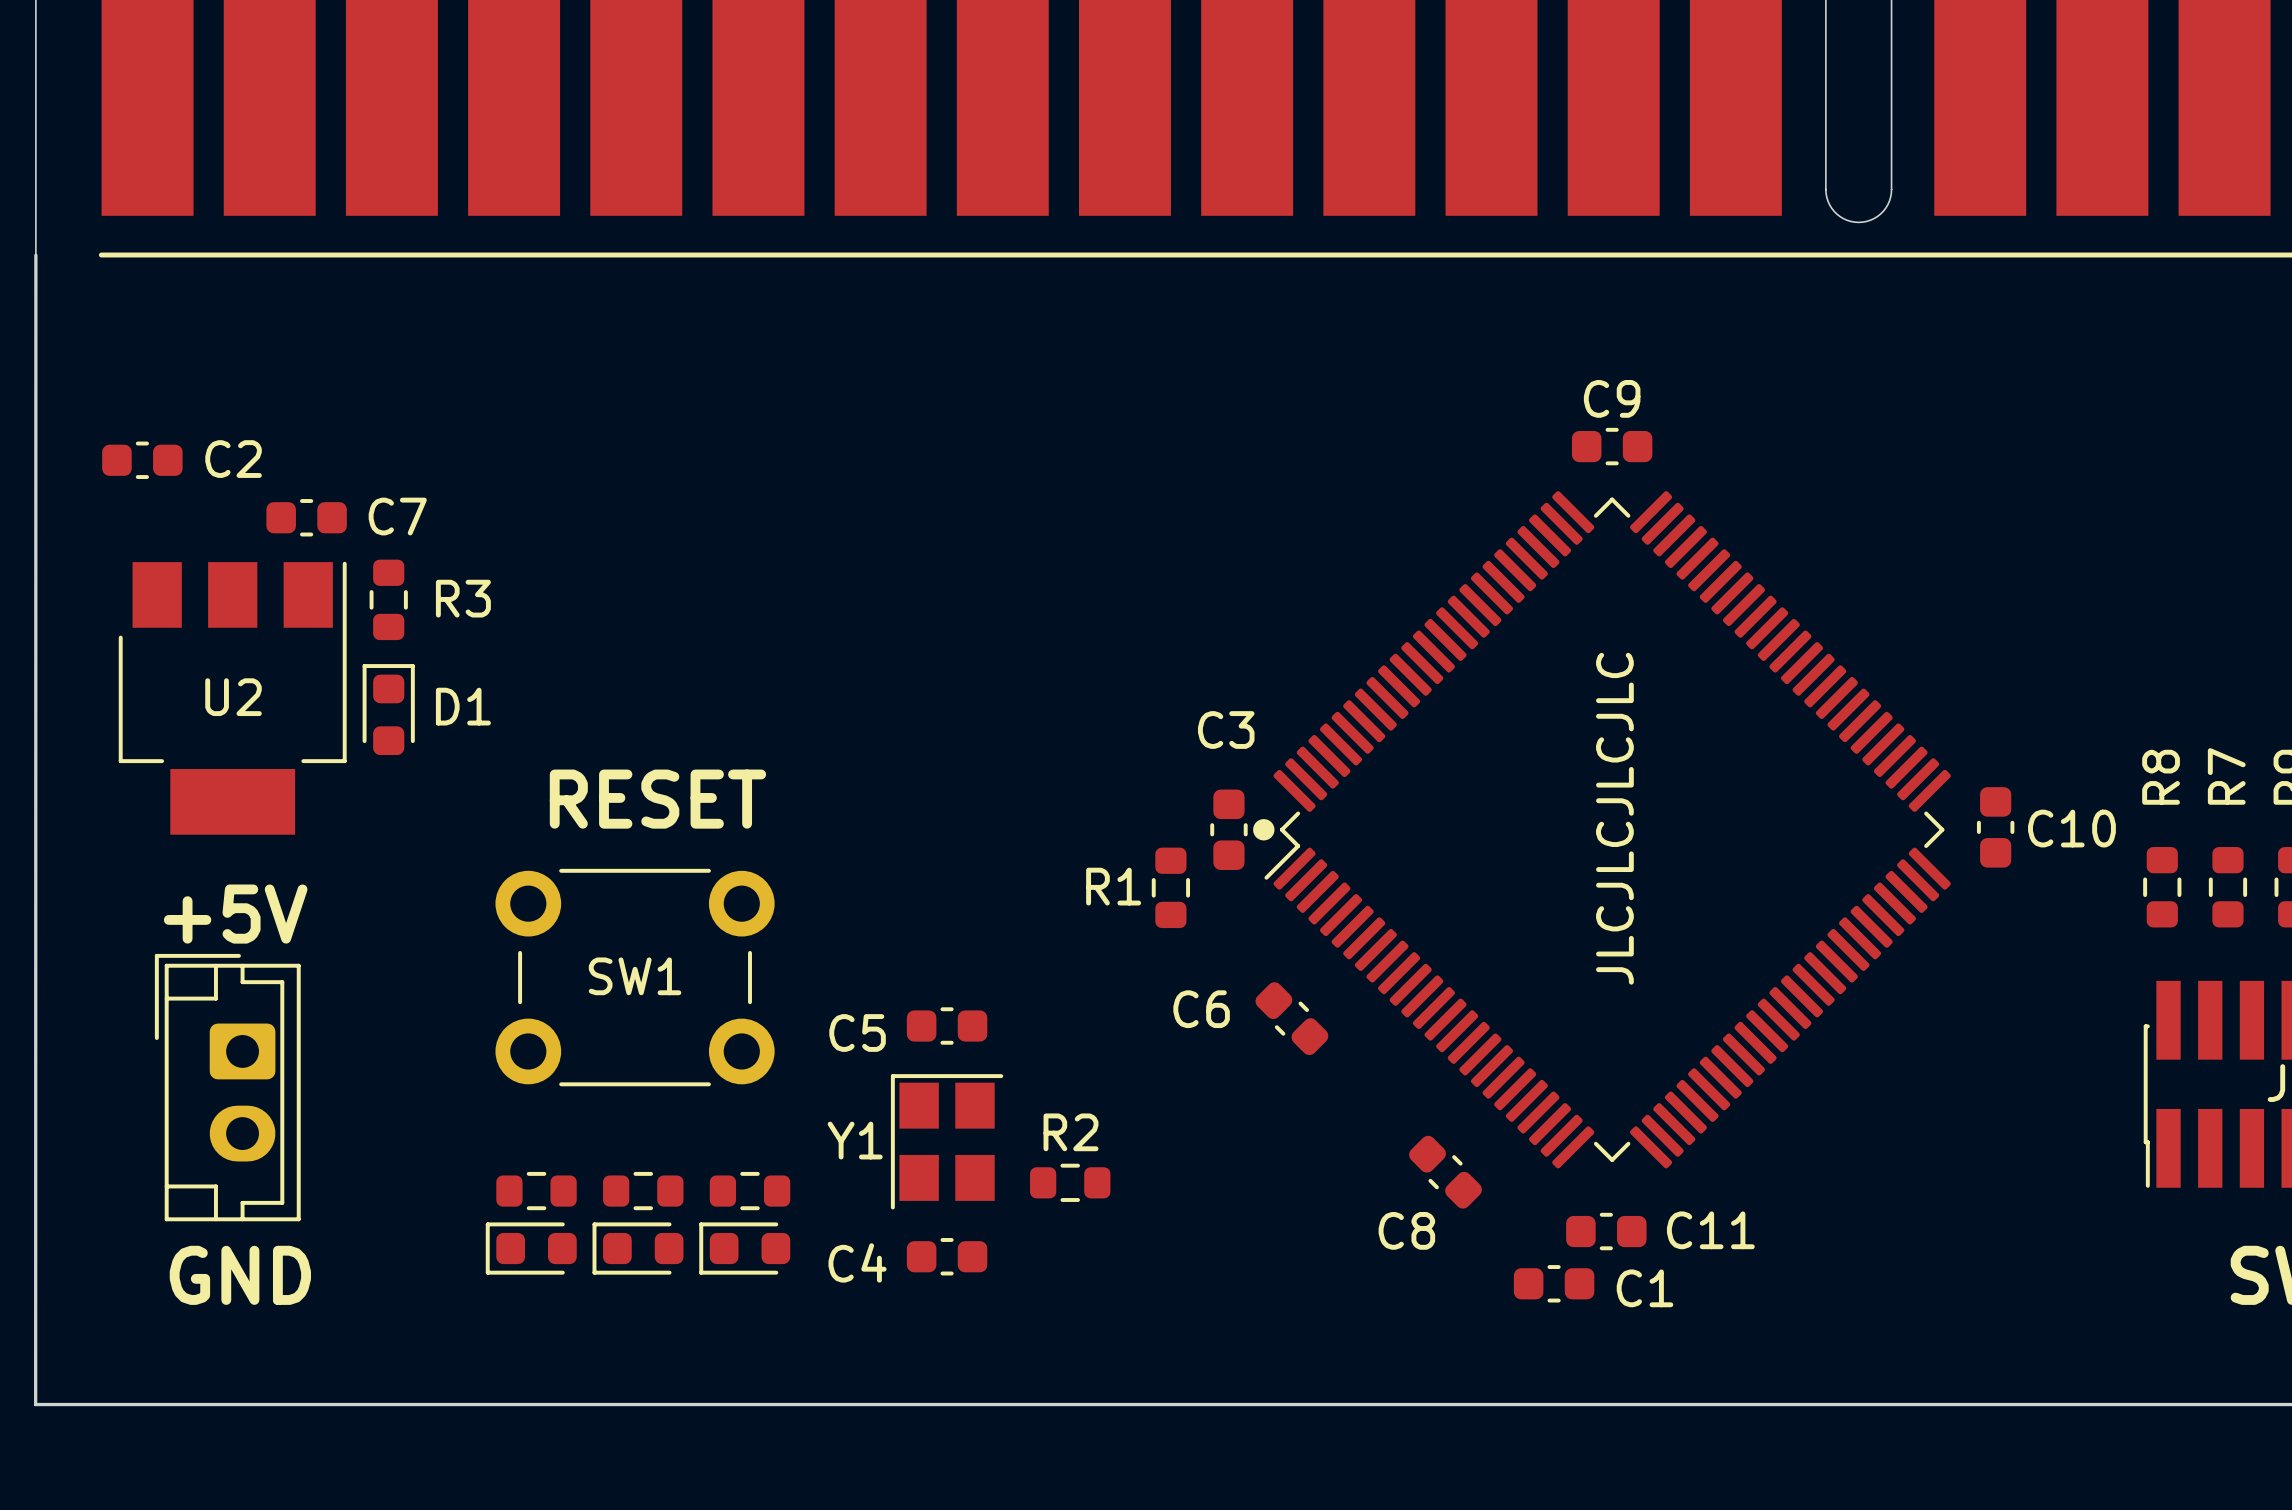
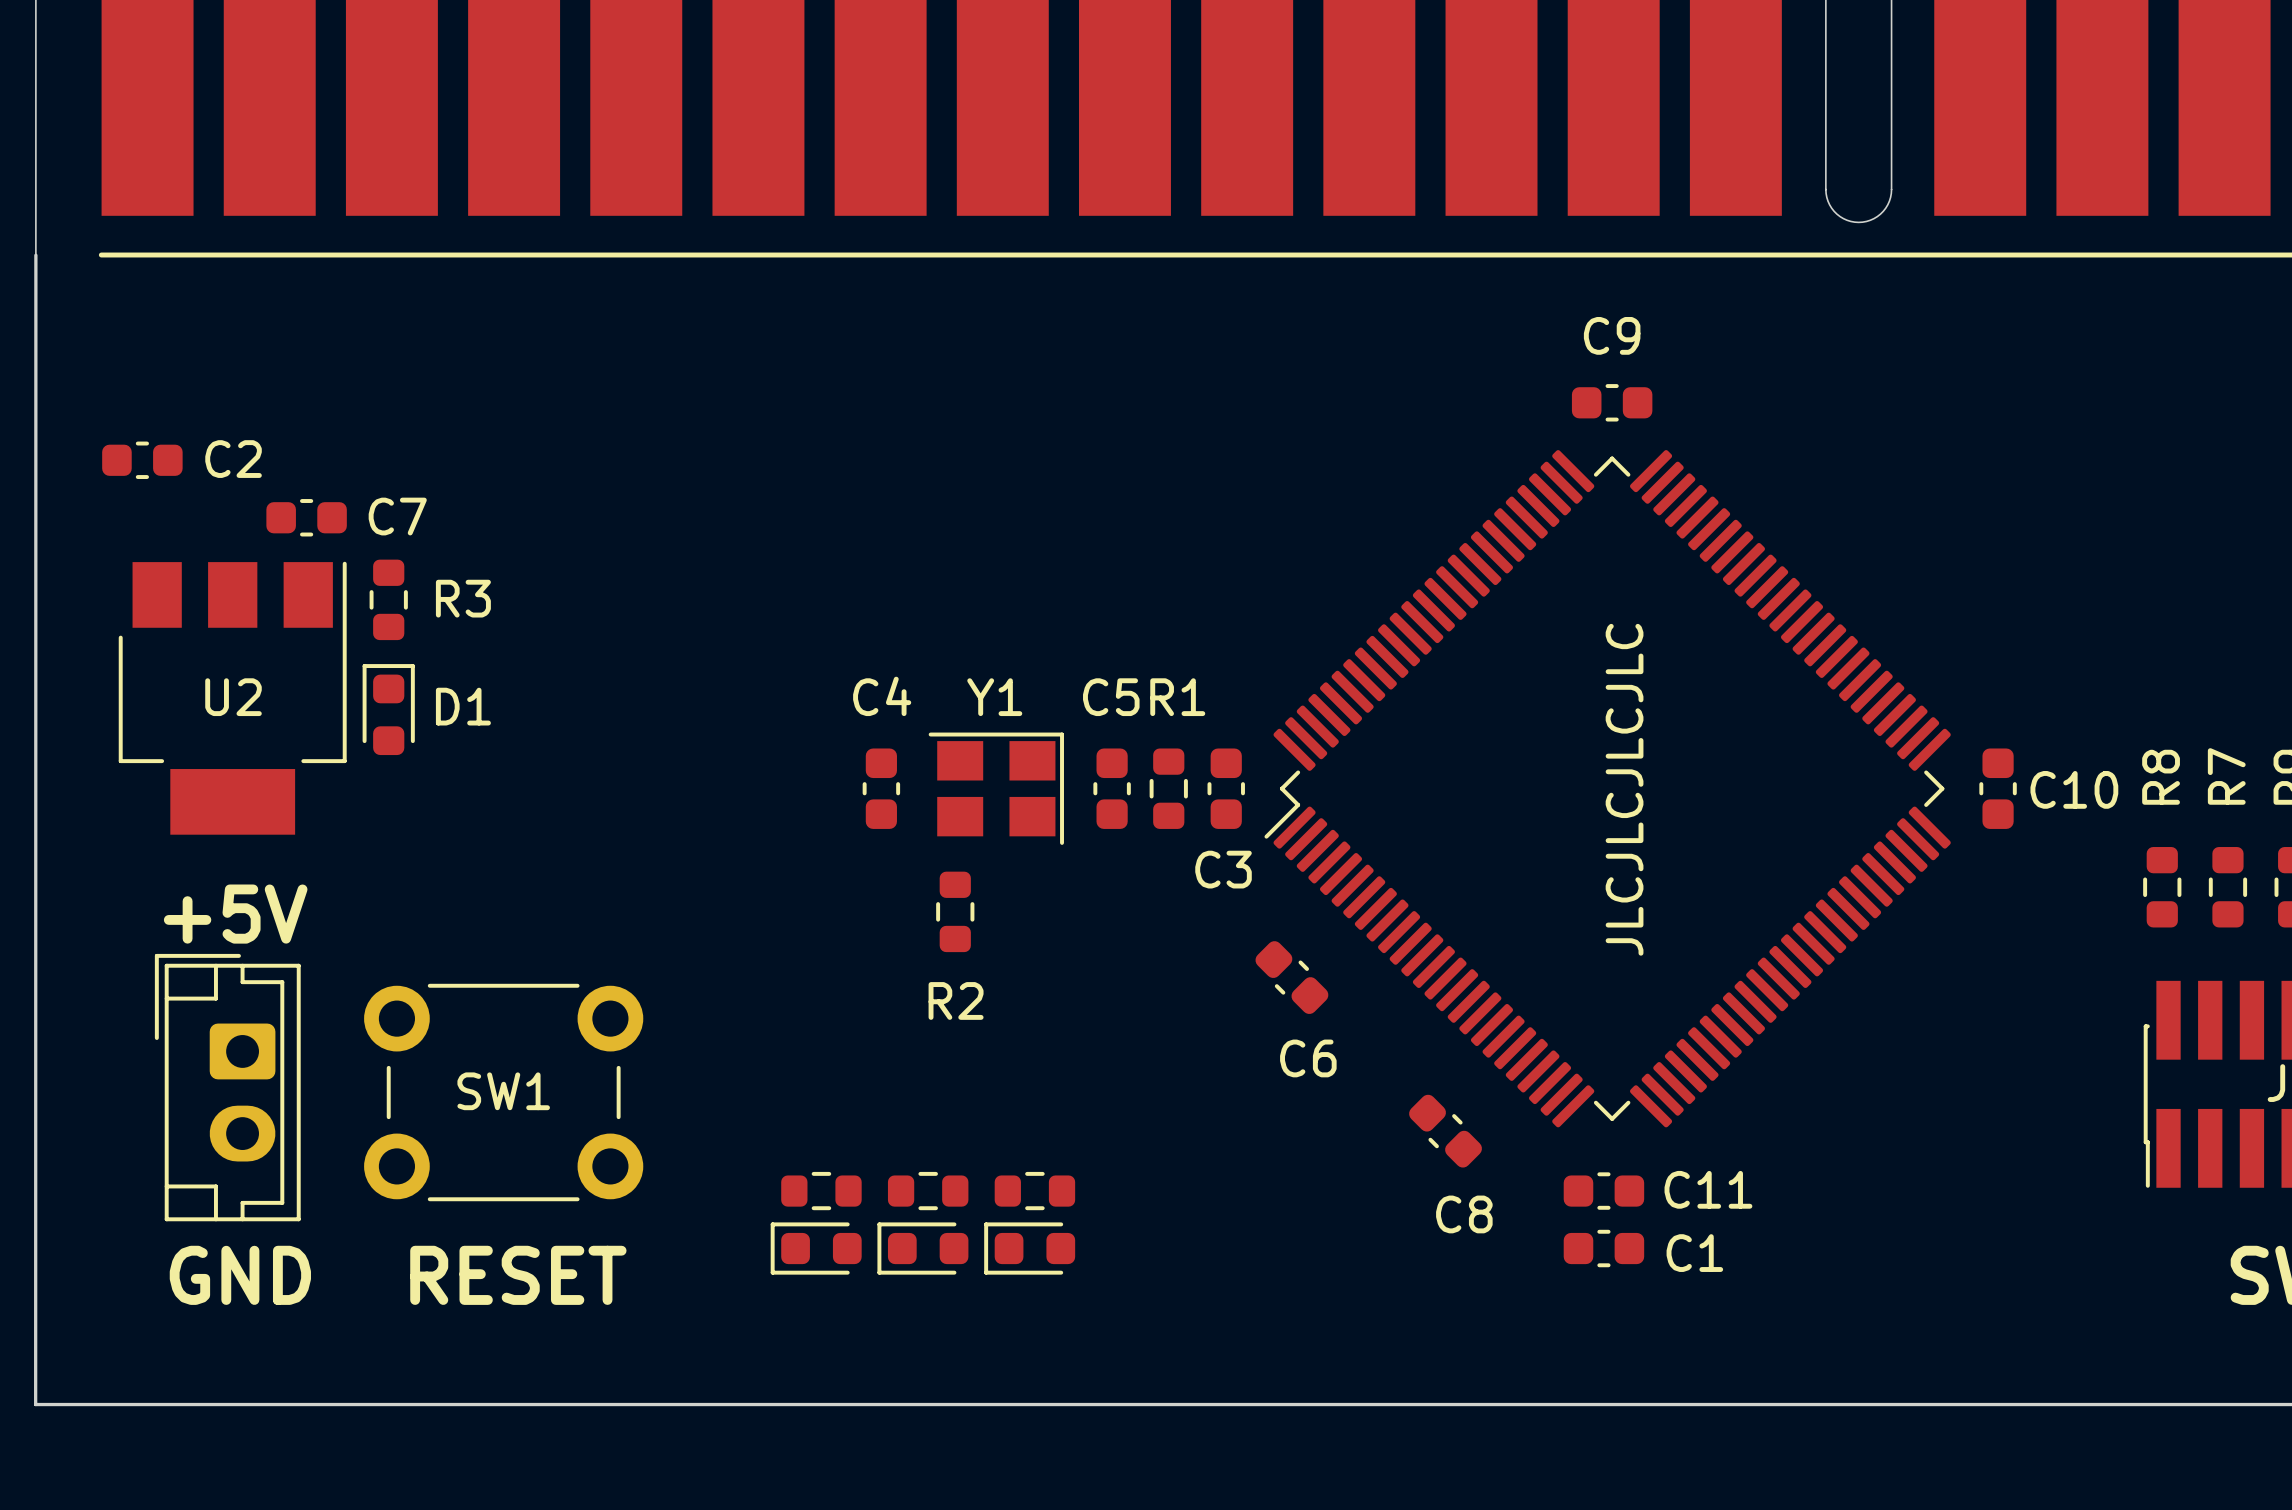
C9 name position: C9 (1612, 398) -> C9 (1612, 335)
C9 position: (1612, 446) -> (1612, 402)
C3 name position: C3 (1226, 730) -> C3 (1223, 869)
text position: RESET (657, 799) -> RESET (518, 1275)
text position: JLCJLCJLCJLC (1614, 818) -> JLCJLCJLCJLC (1624, 789)
drawing: [1253, 819, 1275, 841] -> none
C10 position: (1995, 827) -> (1998, 788)
C3 position: (1228, 829) -> (1226, 788)
part position: (1607, 829) -> (1607, 788)
R1 name position: R1 (1113, 886) -> R1 (1177, 697)
R1 position: (1170, 887) -> (1168, 788)
SW1 position: (635, 977) -> (503, 1092)
C6 name position: C6 (1201, 1009) -> C6 (1308, 1058)
C6 position: (1291, 1018) -> (1291, 977)
C5 rotation: 0° (947, 1026) -> 90° clockwise (1112, 788)
C5 position: (947, 1026) -> (1112, 788)
R2 name position: R2 (1071, 1132) -> R2 (956, 1000)
Y1 rotation: 0° (947, 1141) -> 90° clockwise (996, 788)
Y1 position: (947, 1141) -> (996, 788)
C8 position: (1445, 1172) -> (1445, 1131)
R2 rotation: 0° (1070, 1182) -> 90° clockwise (955, 911)
R2 position: (1070, 1182) -> (955, 911)
part: (536, 1191) -> none
part: (643, 1191) -> none
part position: (750, 1191) -> (821, 1191)
part: none -> (928, 1191)
part: none -> (1034, 1191)
C8 name position: C8 (1406, 1230) -> C8 (1464, 1214)
C11 position: (1606, 1231) -> (1603, 1191)
part: (531, 1248) -> none
part: (638, 1248) -> none
part position: (744, 1248) -> (816, 1248)
part: none -> (922, 1248)
part: none -> (1029, 1248)
C4 rotation: 0° (947, 1256) -> 90° clockwise (881, 788)
C4 position: (947, 1256) -> (881, 788)
C1 position: (1554, 1283) -> (1603, 1248)

